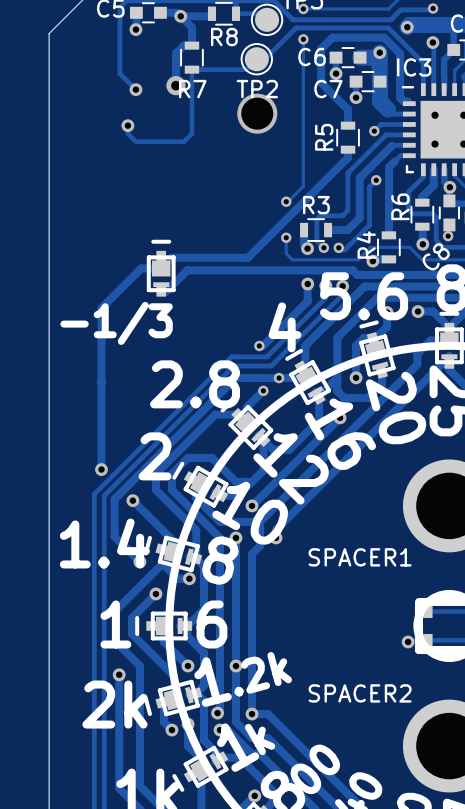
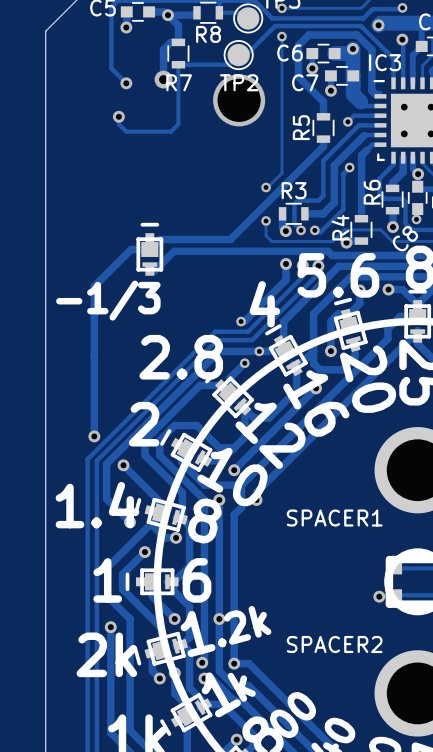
via size: [237, 93, 278, 134] -> [213, 74, 266, 127]

